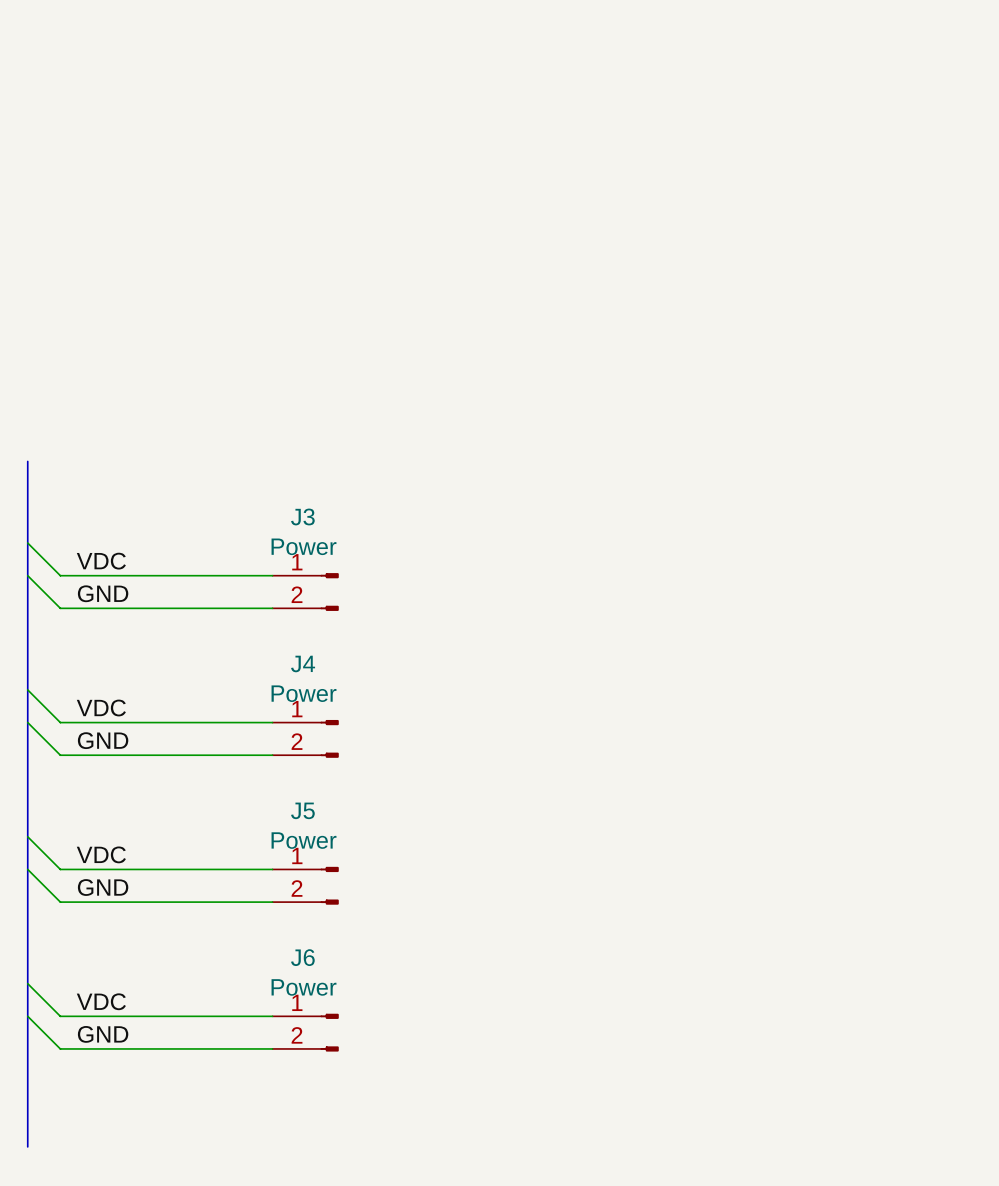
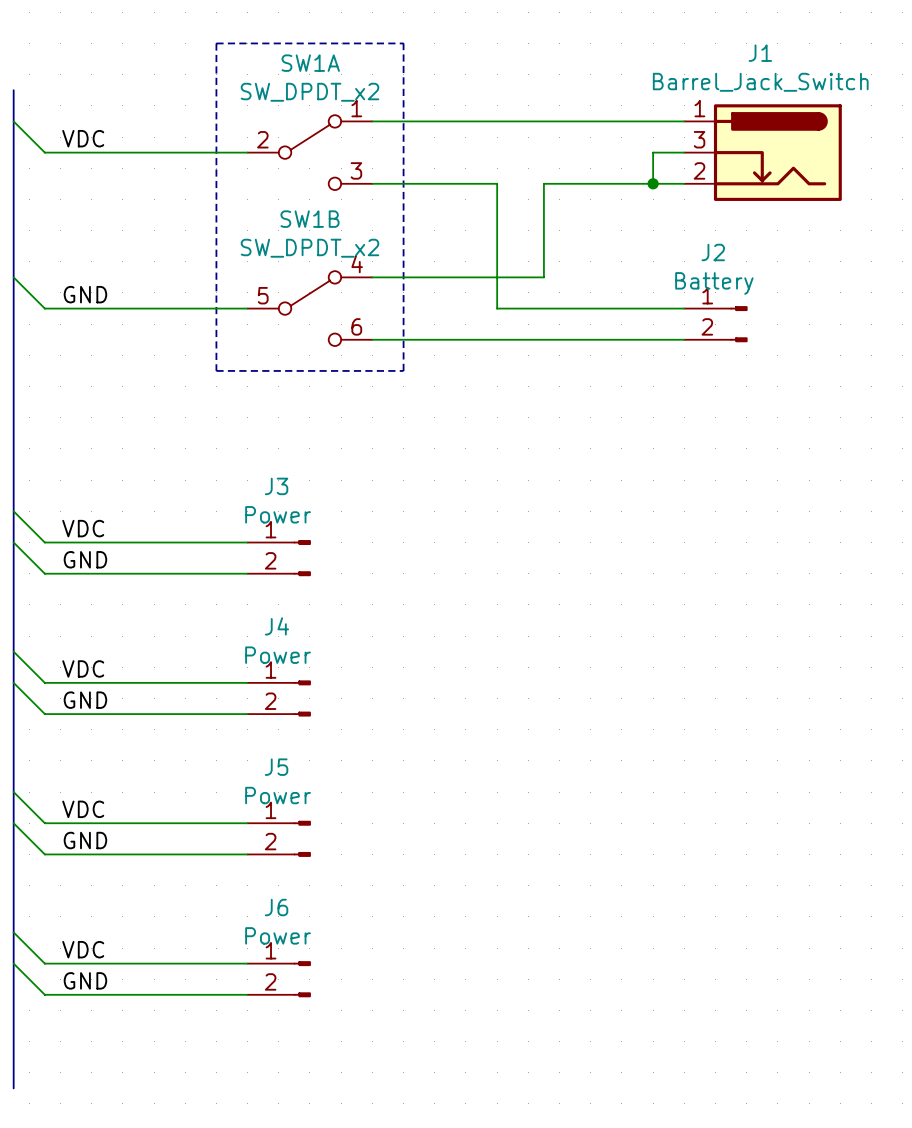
line: none -> (216, 43) (216, 370) (403, 370) (403, 43) (216, 43)
bus: none -> (13, 90) (13, 433)
wire: none -> (13, 121) (44, 152) (247, 152)
wire: none -> (372, 121) (684, 121)
label: none -> VDC (83, 138)
SW1A: none -> SW_DPDT_x2 (309, 152)
wire: none -> (684, 152) (653, 152) (653, 183)
J1: none -> Barrel_Jack_Switch (763, 152)
wire: none -> (372, 183) (497, 183) (497, 308) (684, 308)
junction: none -> (653, 183)
wire: none -> (684, 183) (543, 183) (543, 277) (372, 277)
wire: none -> (13, 277) (44, 308) (247, 308)
label: none -> GND (85, 294)
SW1B: none -> SW_DPDT_x2 (309, 308)
J2: none -> Battery (715, 324)
wire: none -> (372, 339) (684, 339)

